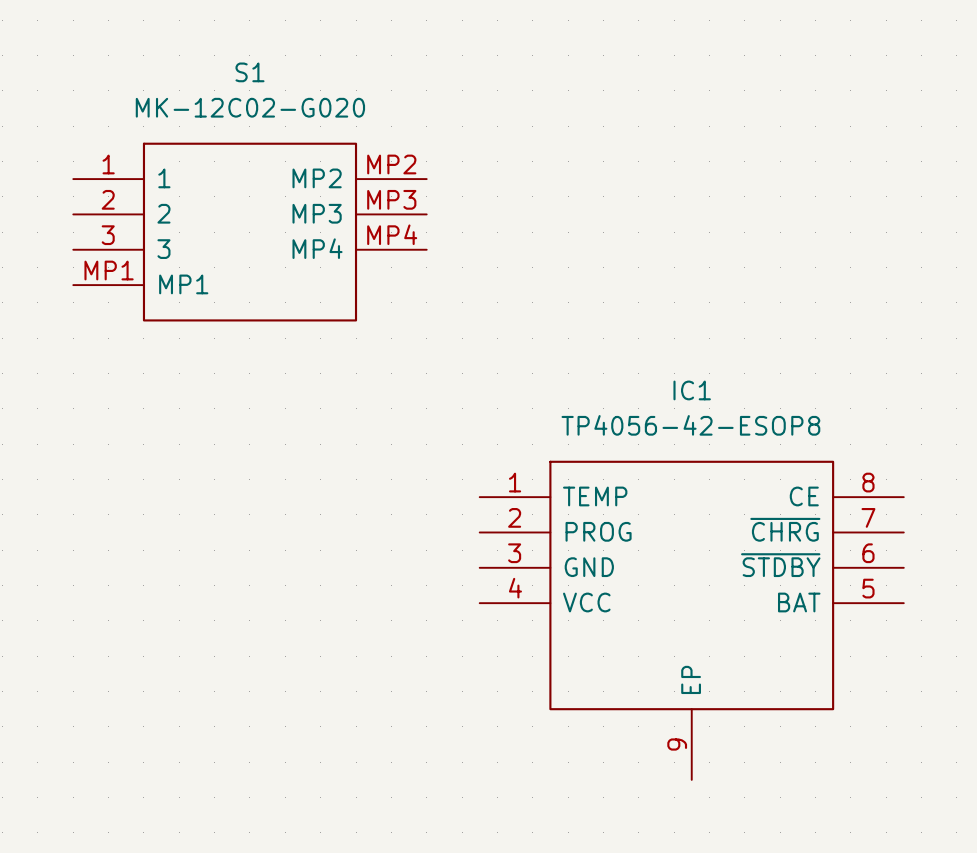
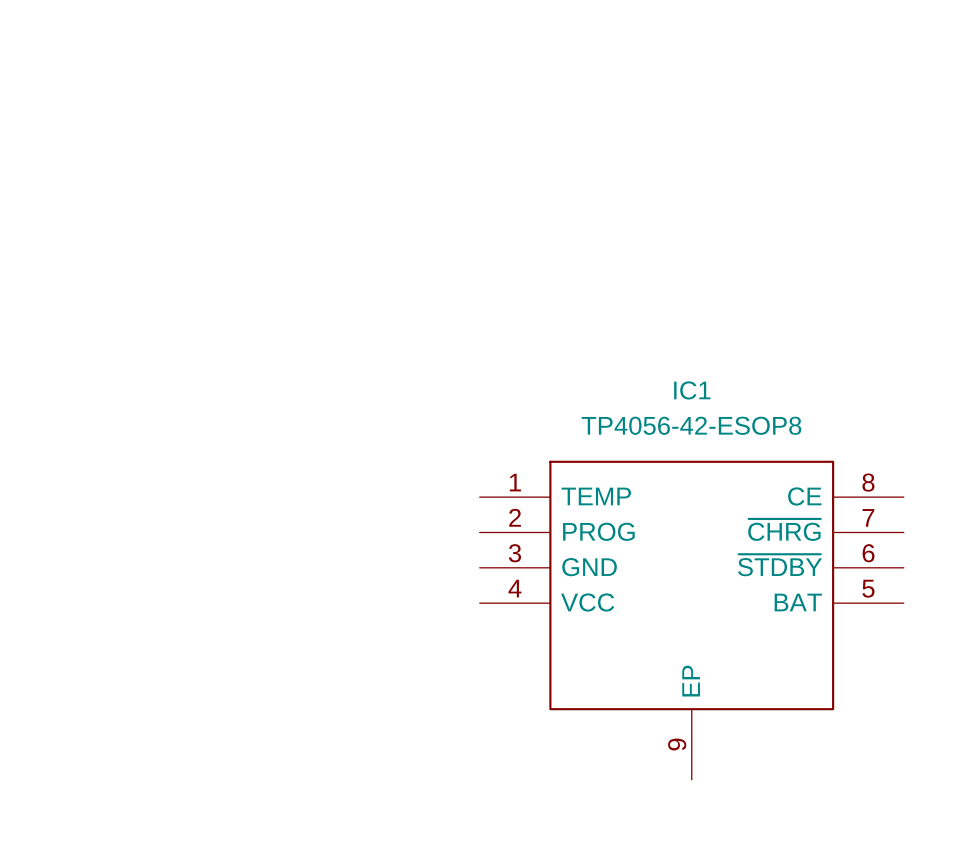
S1: MK-12C02-G020 (249, 232) -> none

